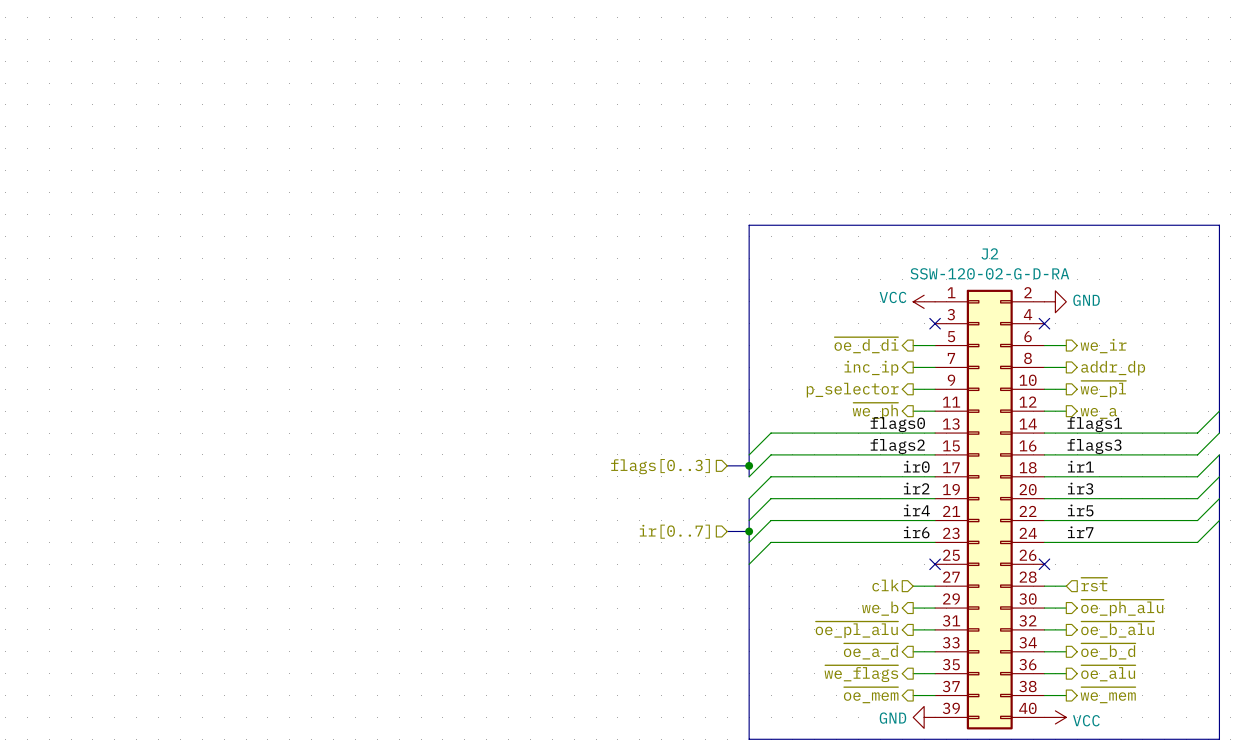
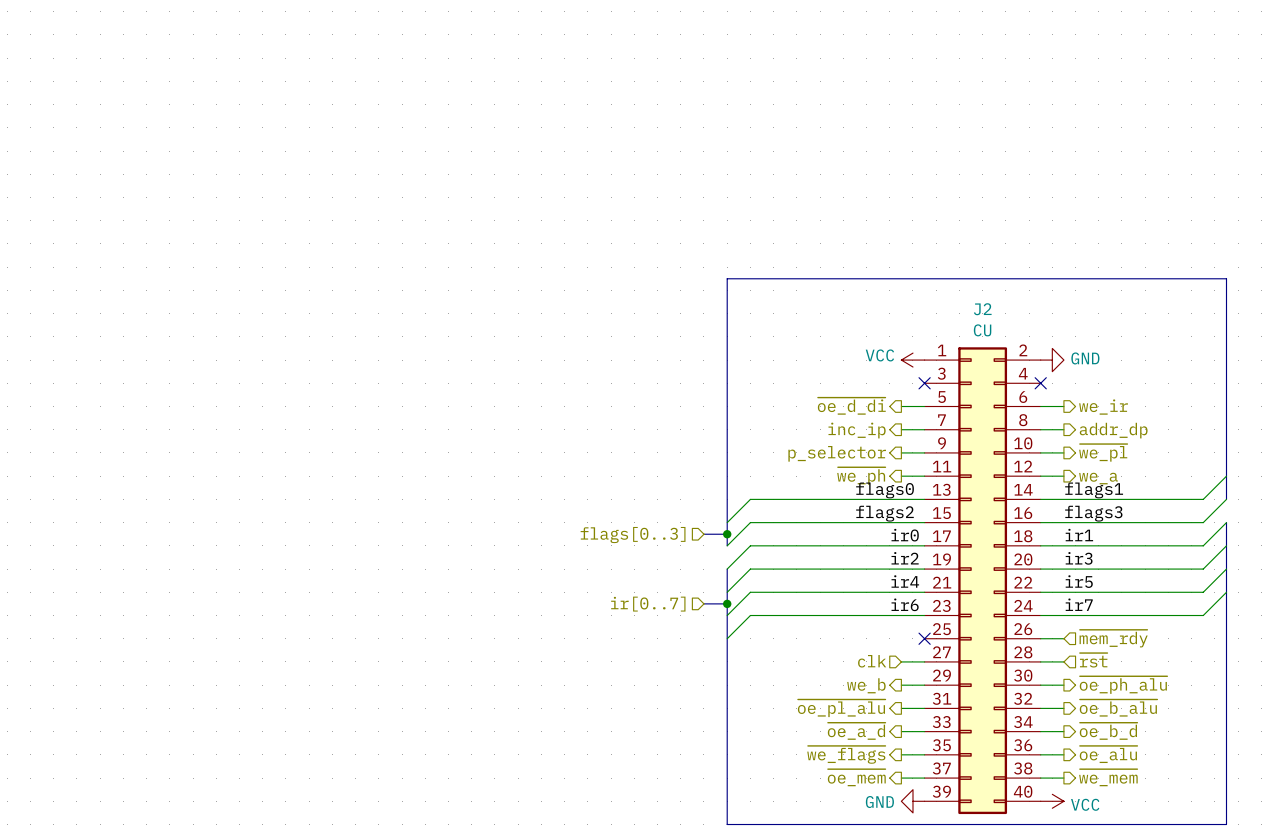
J2 value: SSW-120-02-G-D-RA (989, 273) -> CU (982, 330)
wire: none -> (1040, 638) (1063, 638)
no-connect mark: (1044, 564) -> none
hierarchical label: none -> ~{mem_rdy} (1113, 638)

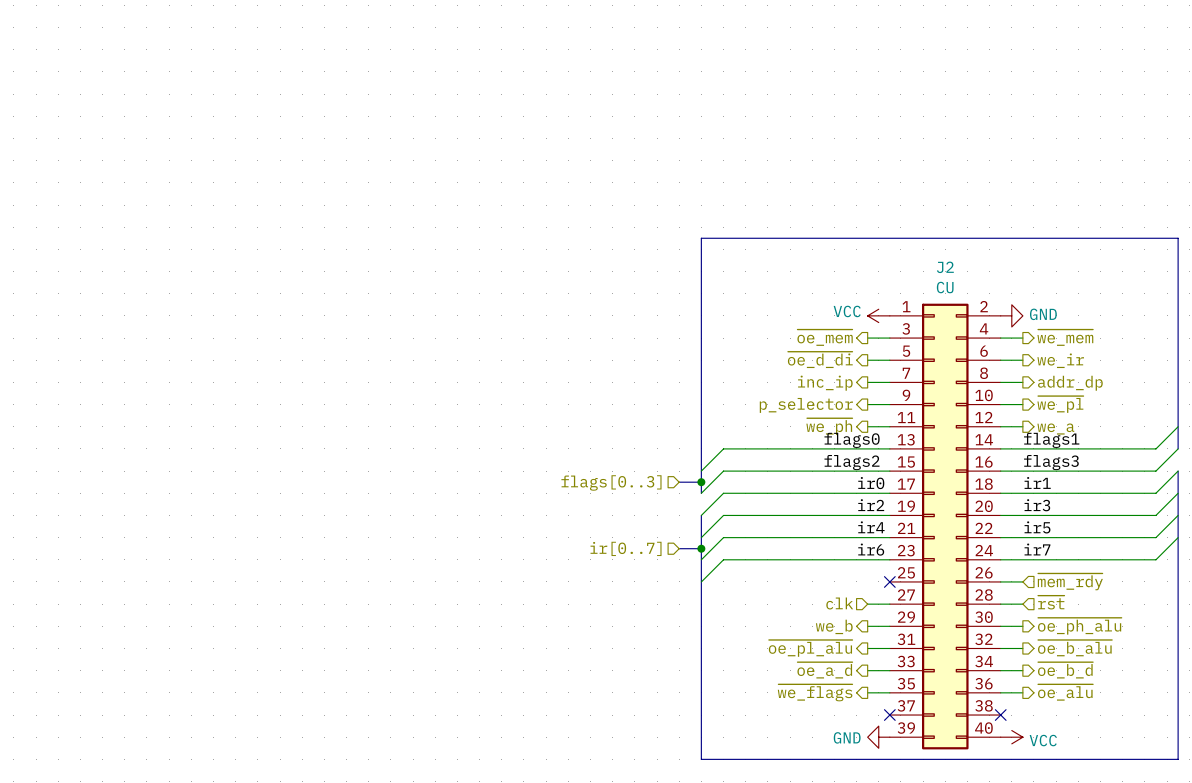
hierarchical label: none -> ~{oe_mem} (825, 337)
hierarchical label: none -> ~{we_mem} (1065, 337)
wire: none -> (867, 338) (889, 338)
no-connect mark: (924, 383) -> none
wire: none -> (1000, 338) (1022, 338)
no-connect mark: (1040, 383) -> none
hierarchical label: ~{oe_mem} (856, 777) -> none
hierarchical label: ~{we_mem} (1108, 777) -> none
wire: (901, 778) (924, 778) -> none
no-connect mark: none -> (889, 715)
wire: (1040, 778) (1063, 778) -> none
no-connect mark: none -> (1000, 715)

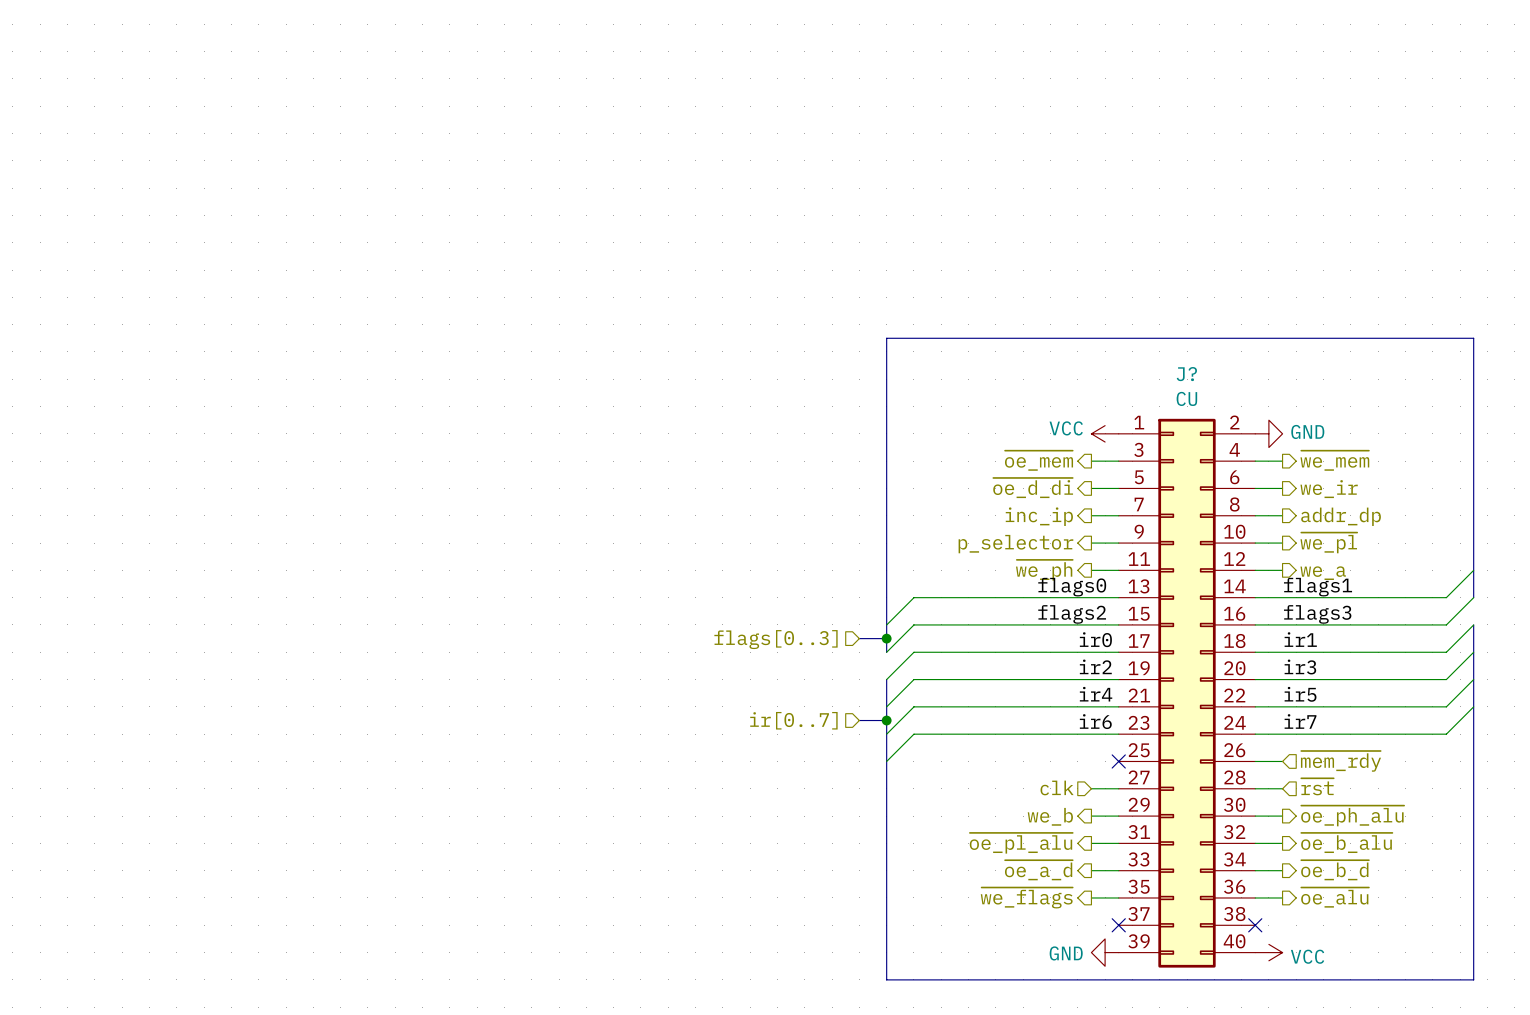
J2 name: J2 (945, 267) -> J? (1186, 374)

